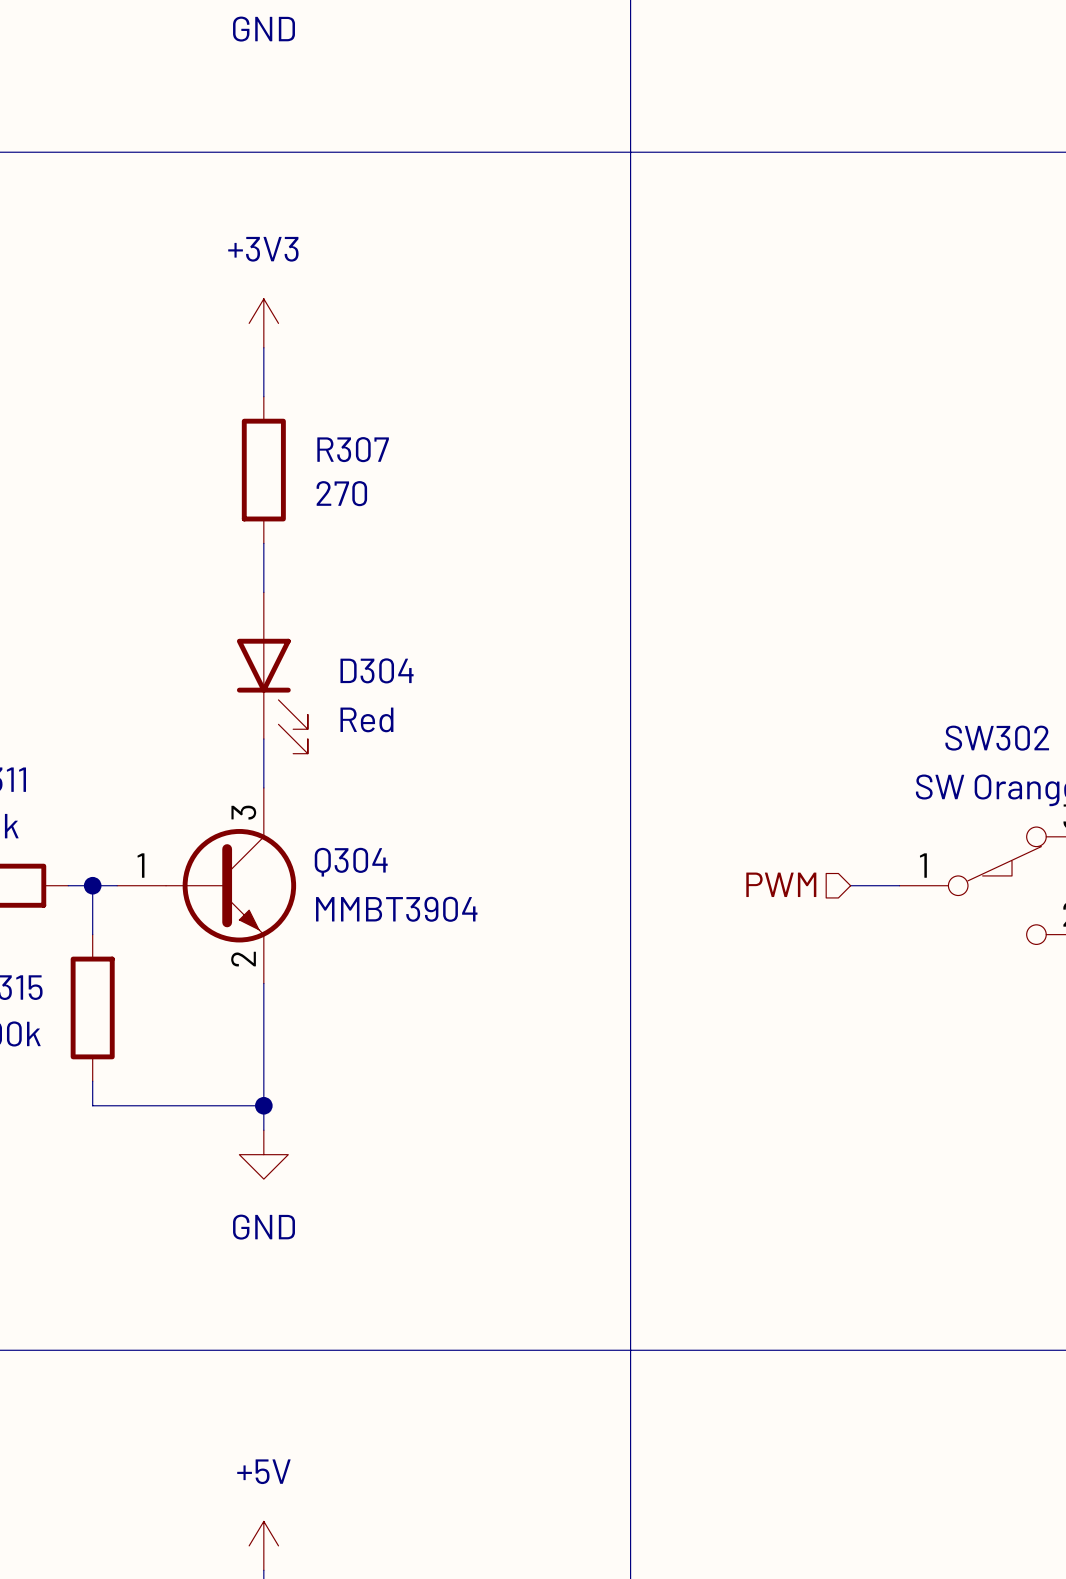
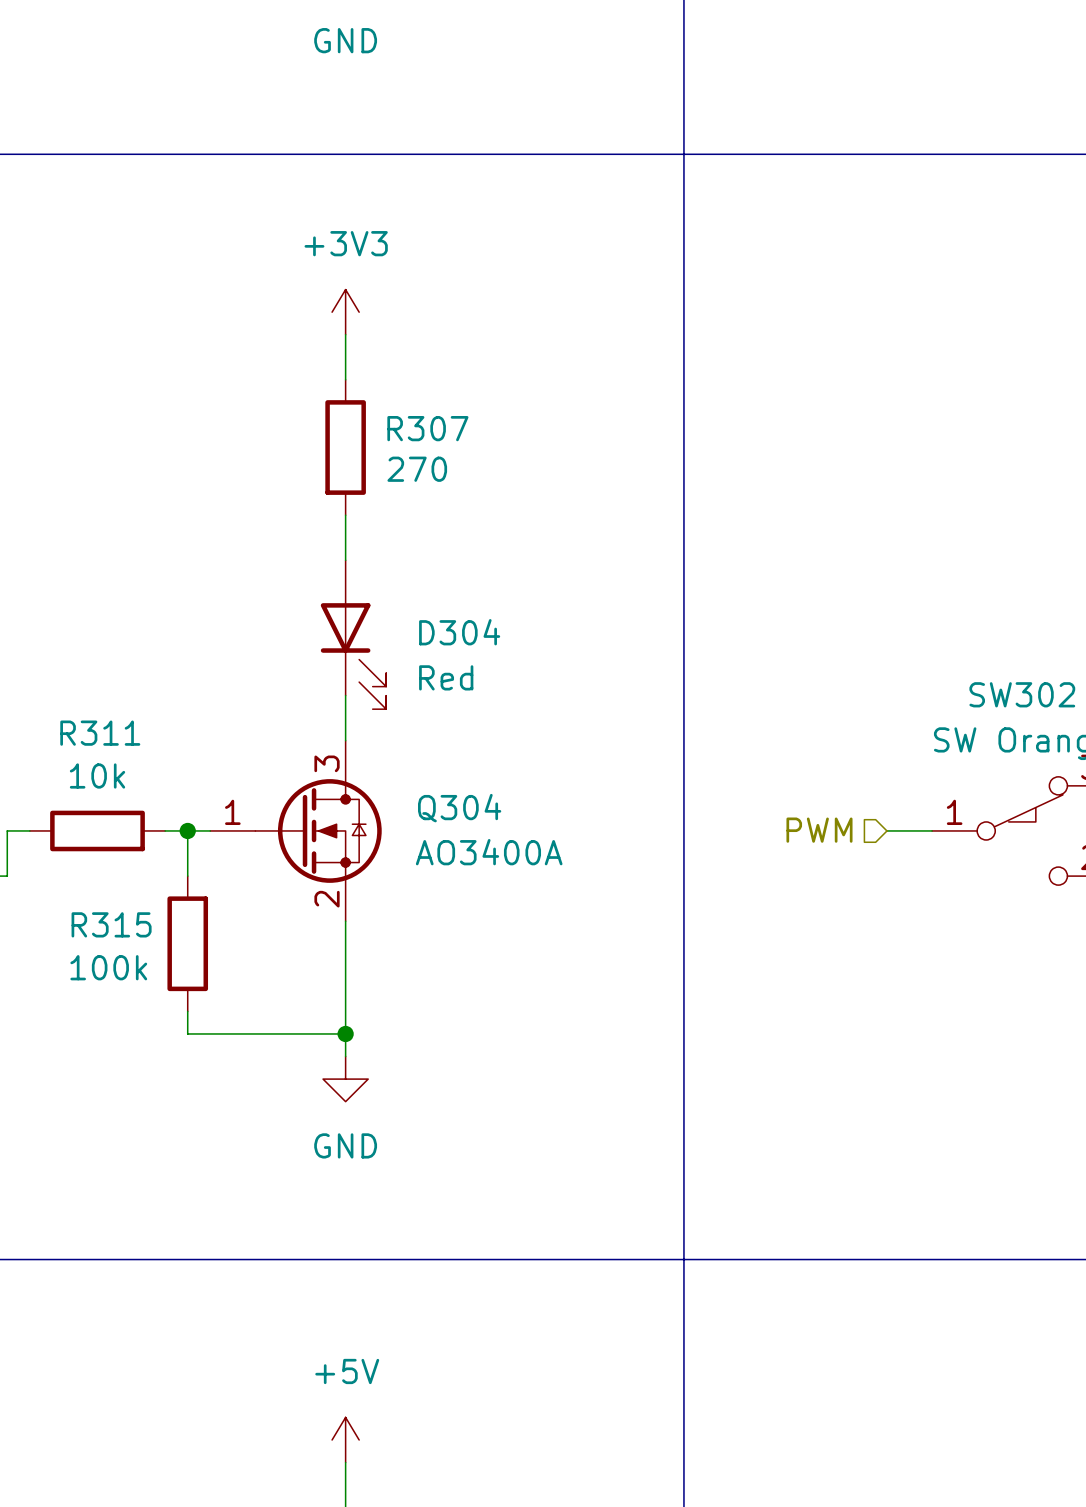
Q304 symbol: [117, 787, 297, 984] -> [210, 740, 382, 922]
Q304 value: MMBT3904 (396, 909) -> AO3400A (489, 852)

